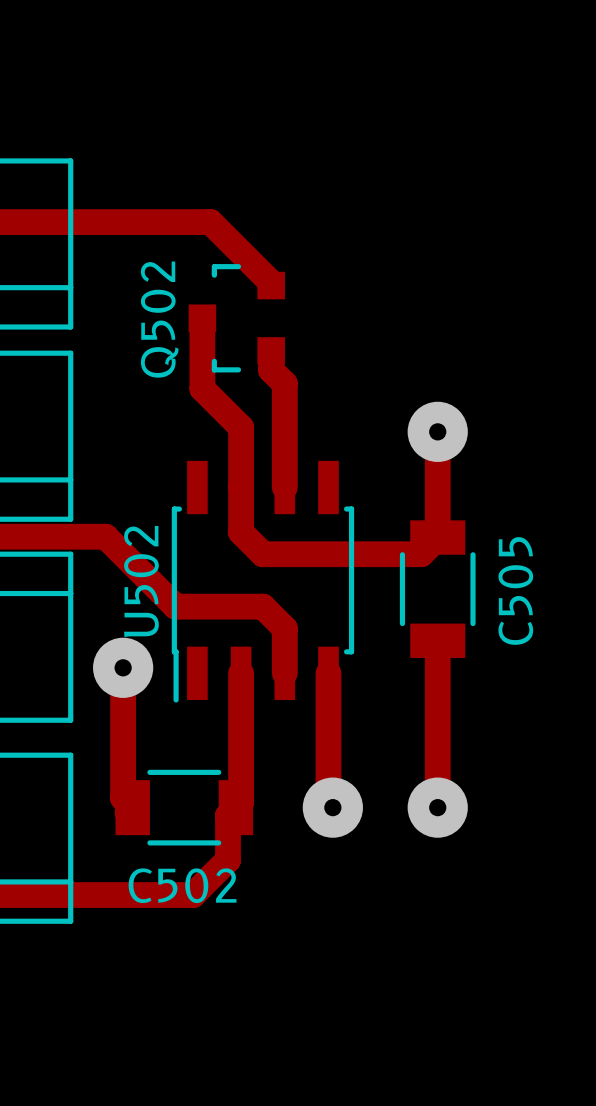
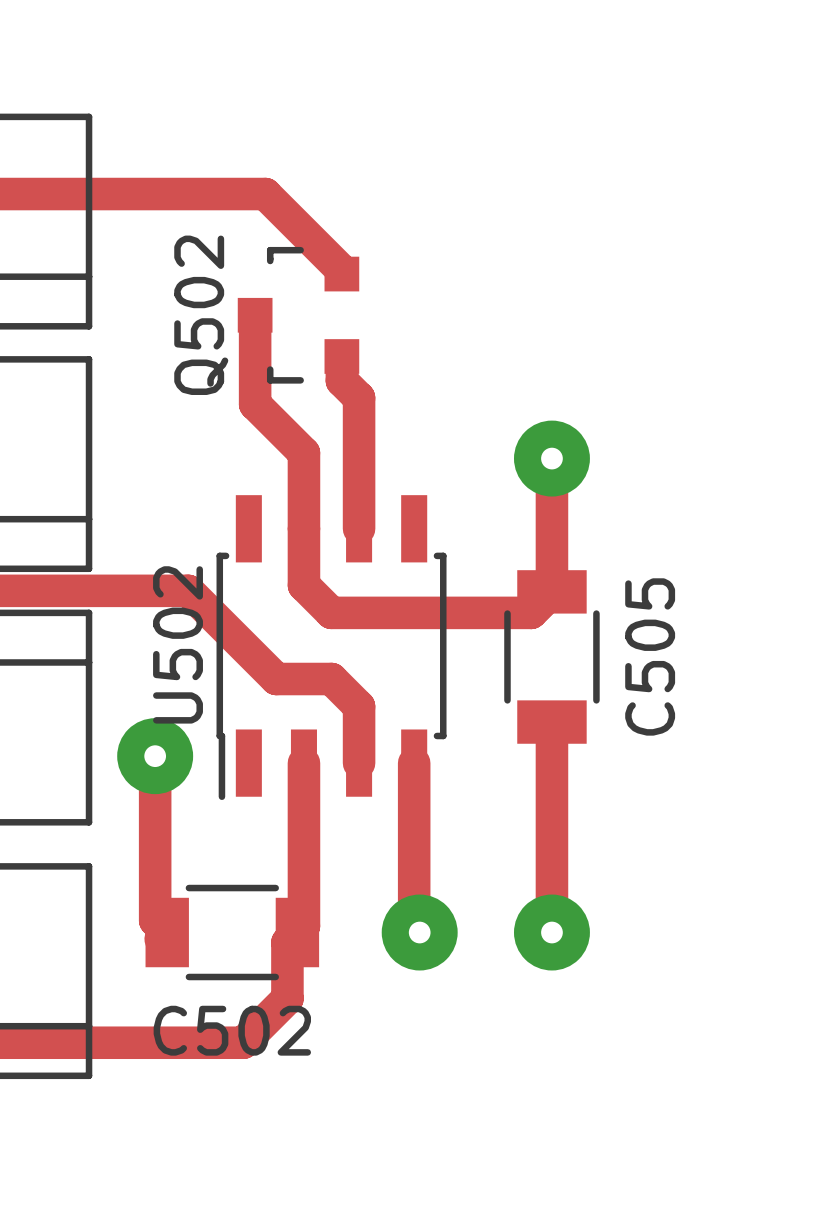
track: (105, 536) (175, 606) (219, 606) -> (133, 590) (188, 590) (276, 679)

